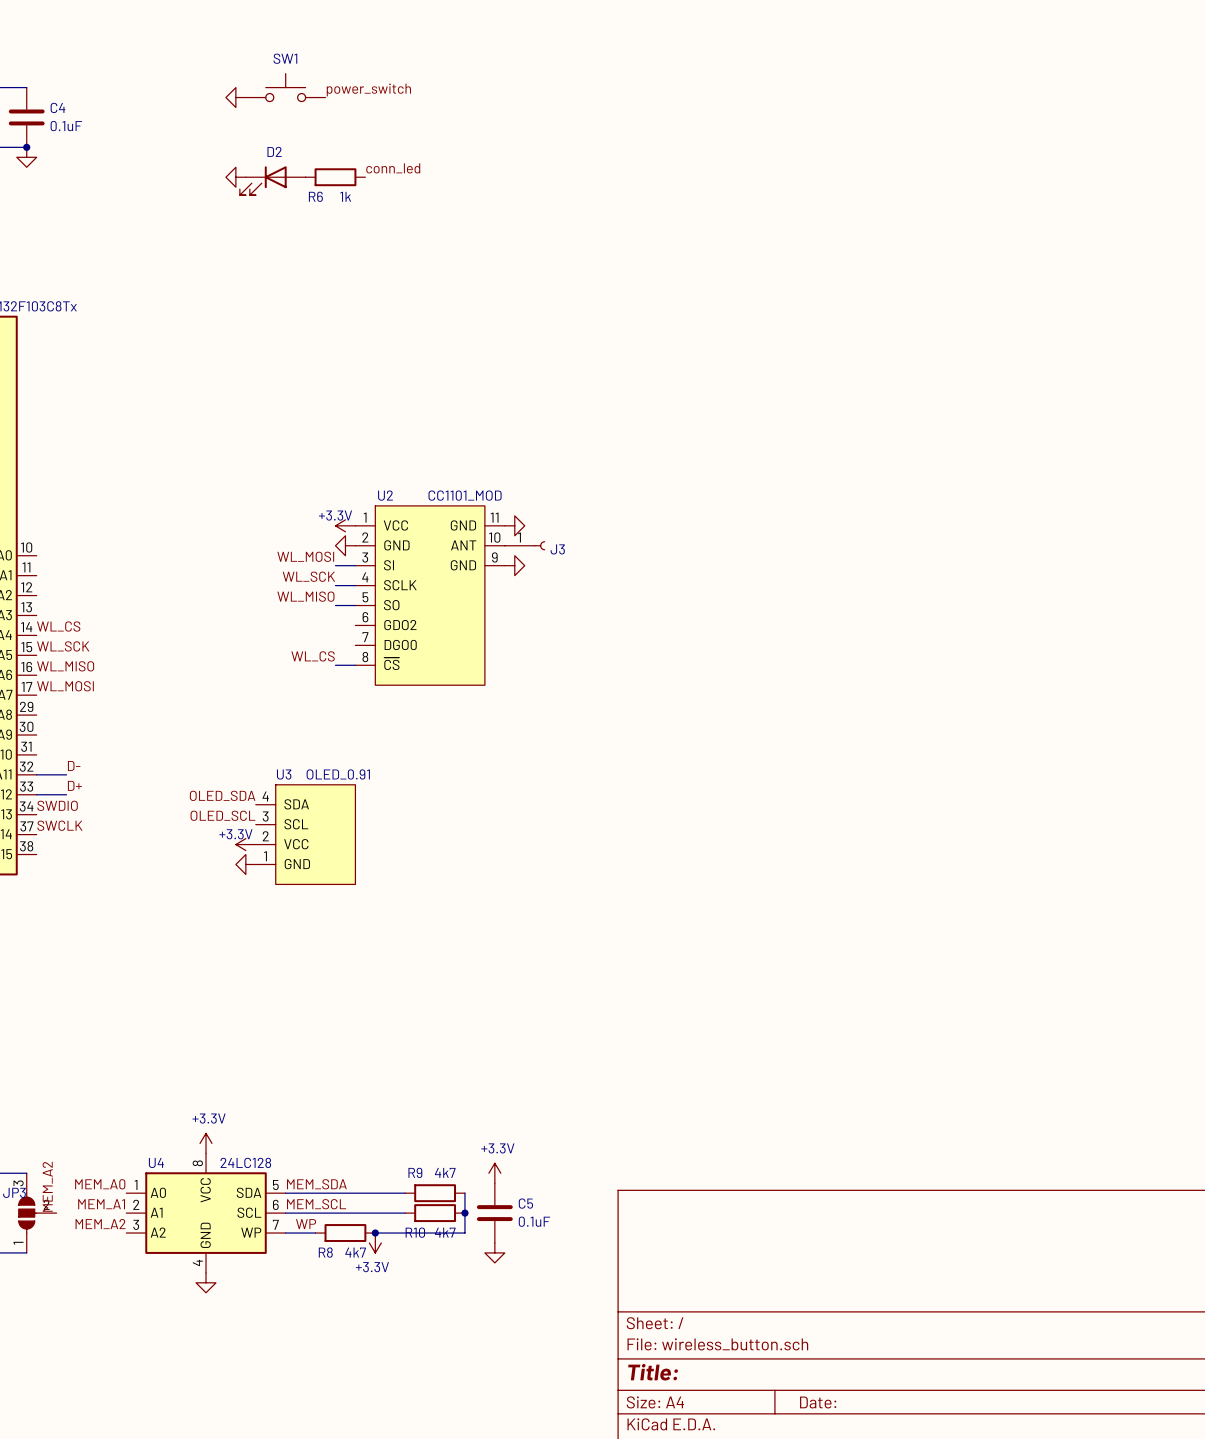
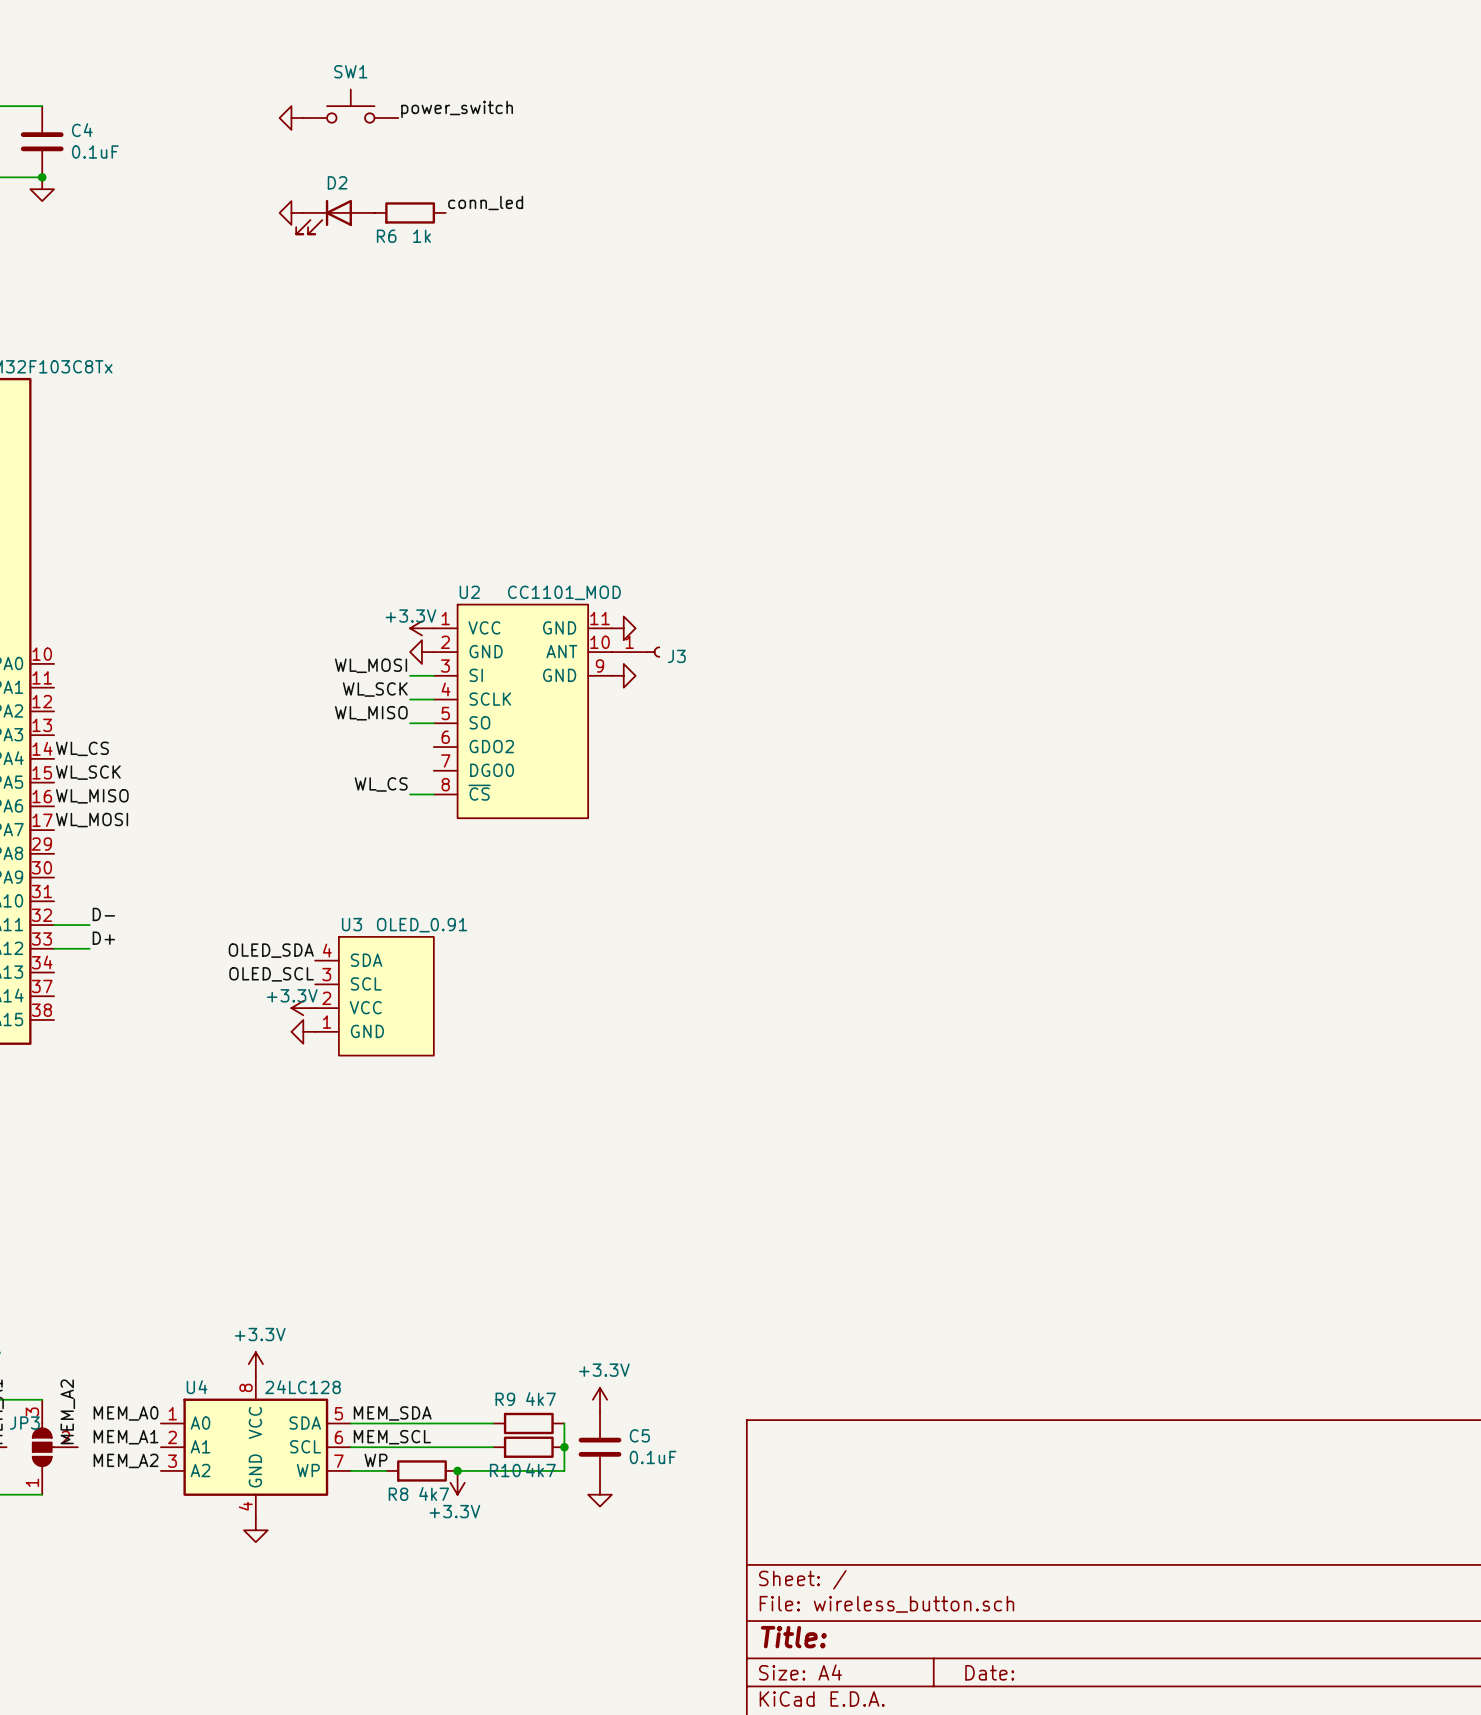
label: SWDIO (57, 805) -> none
label: SWCLK (59, 825) -> none

